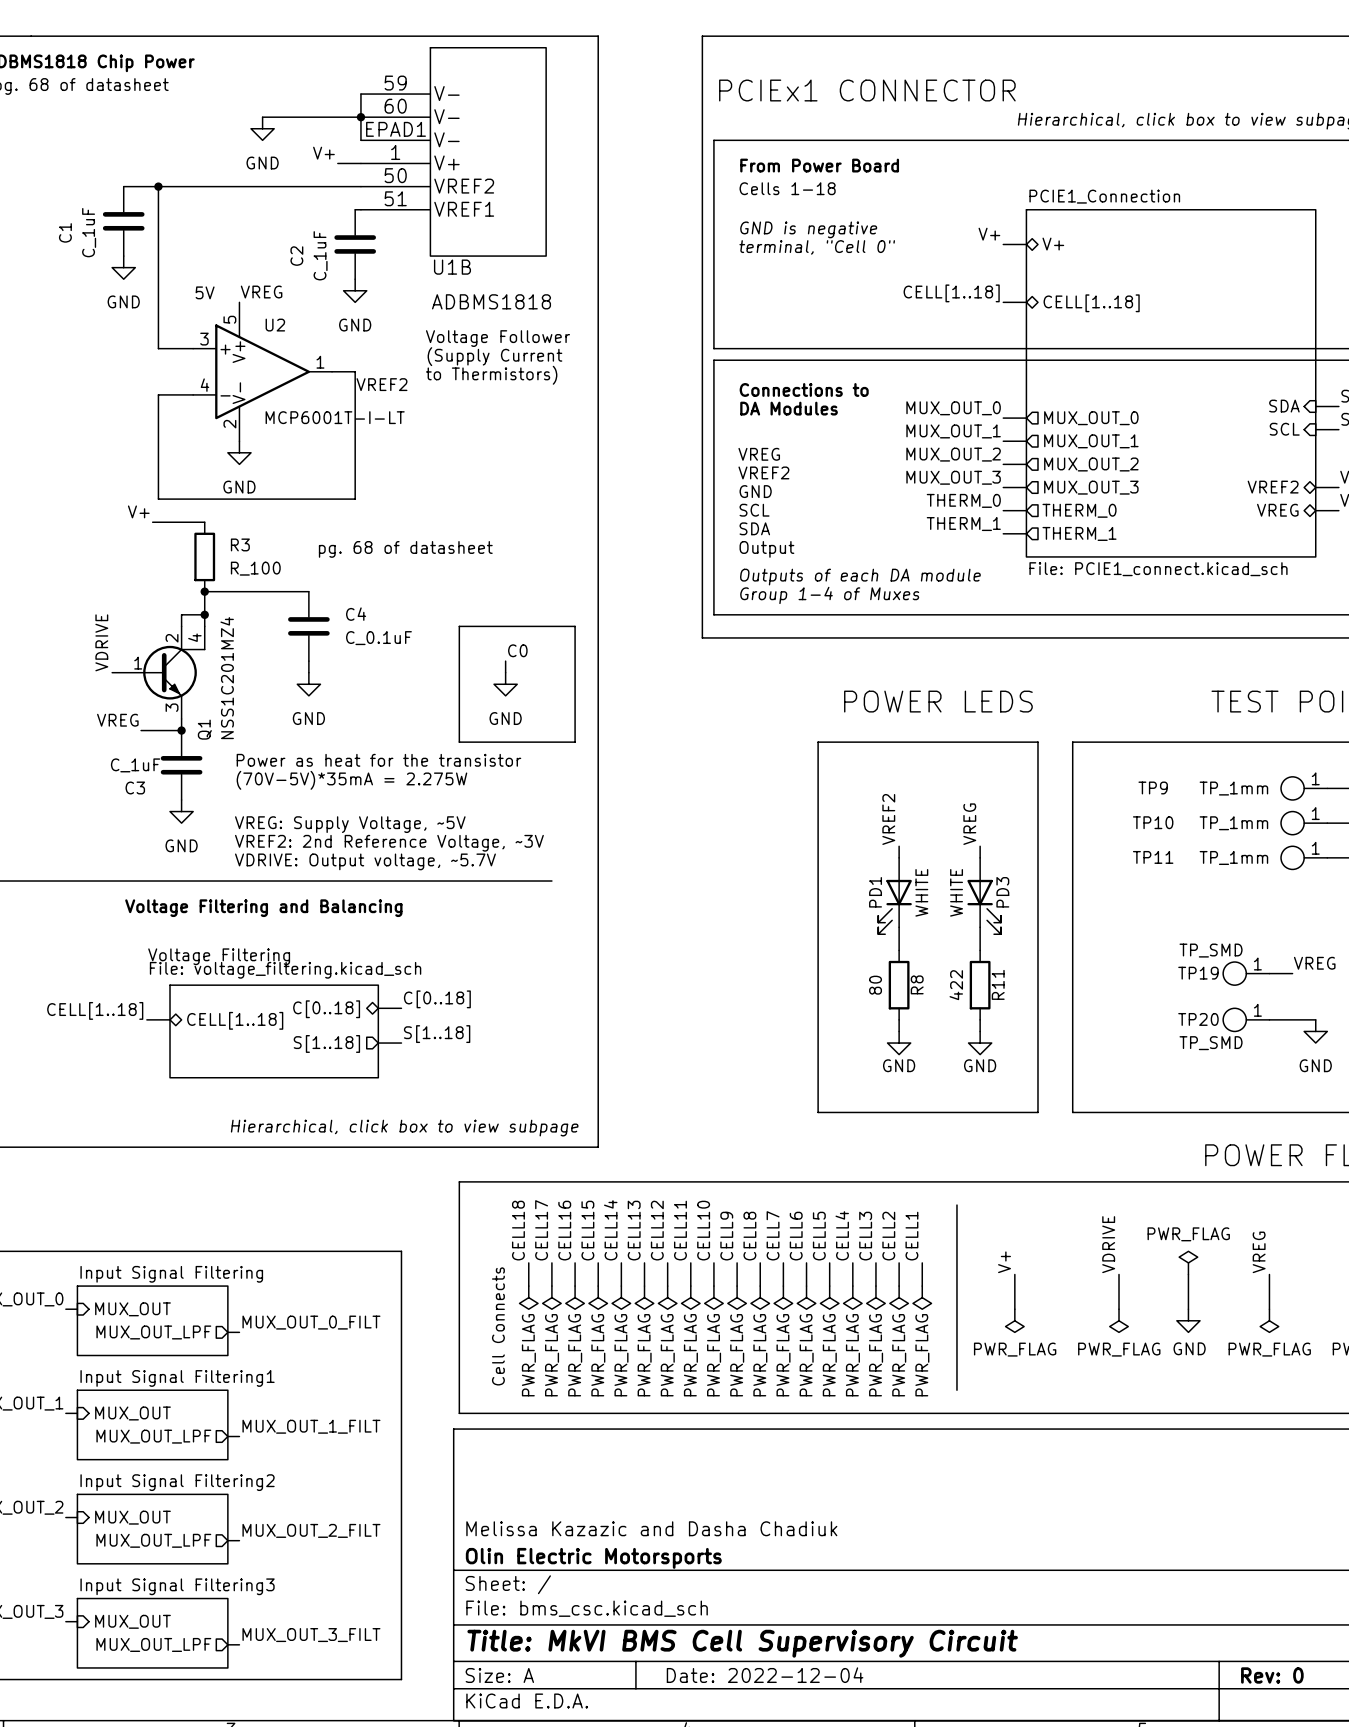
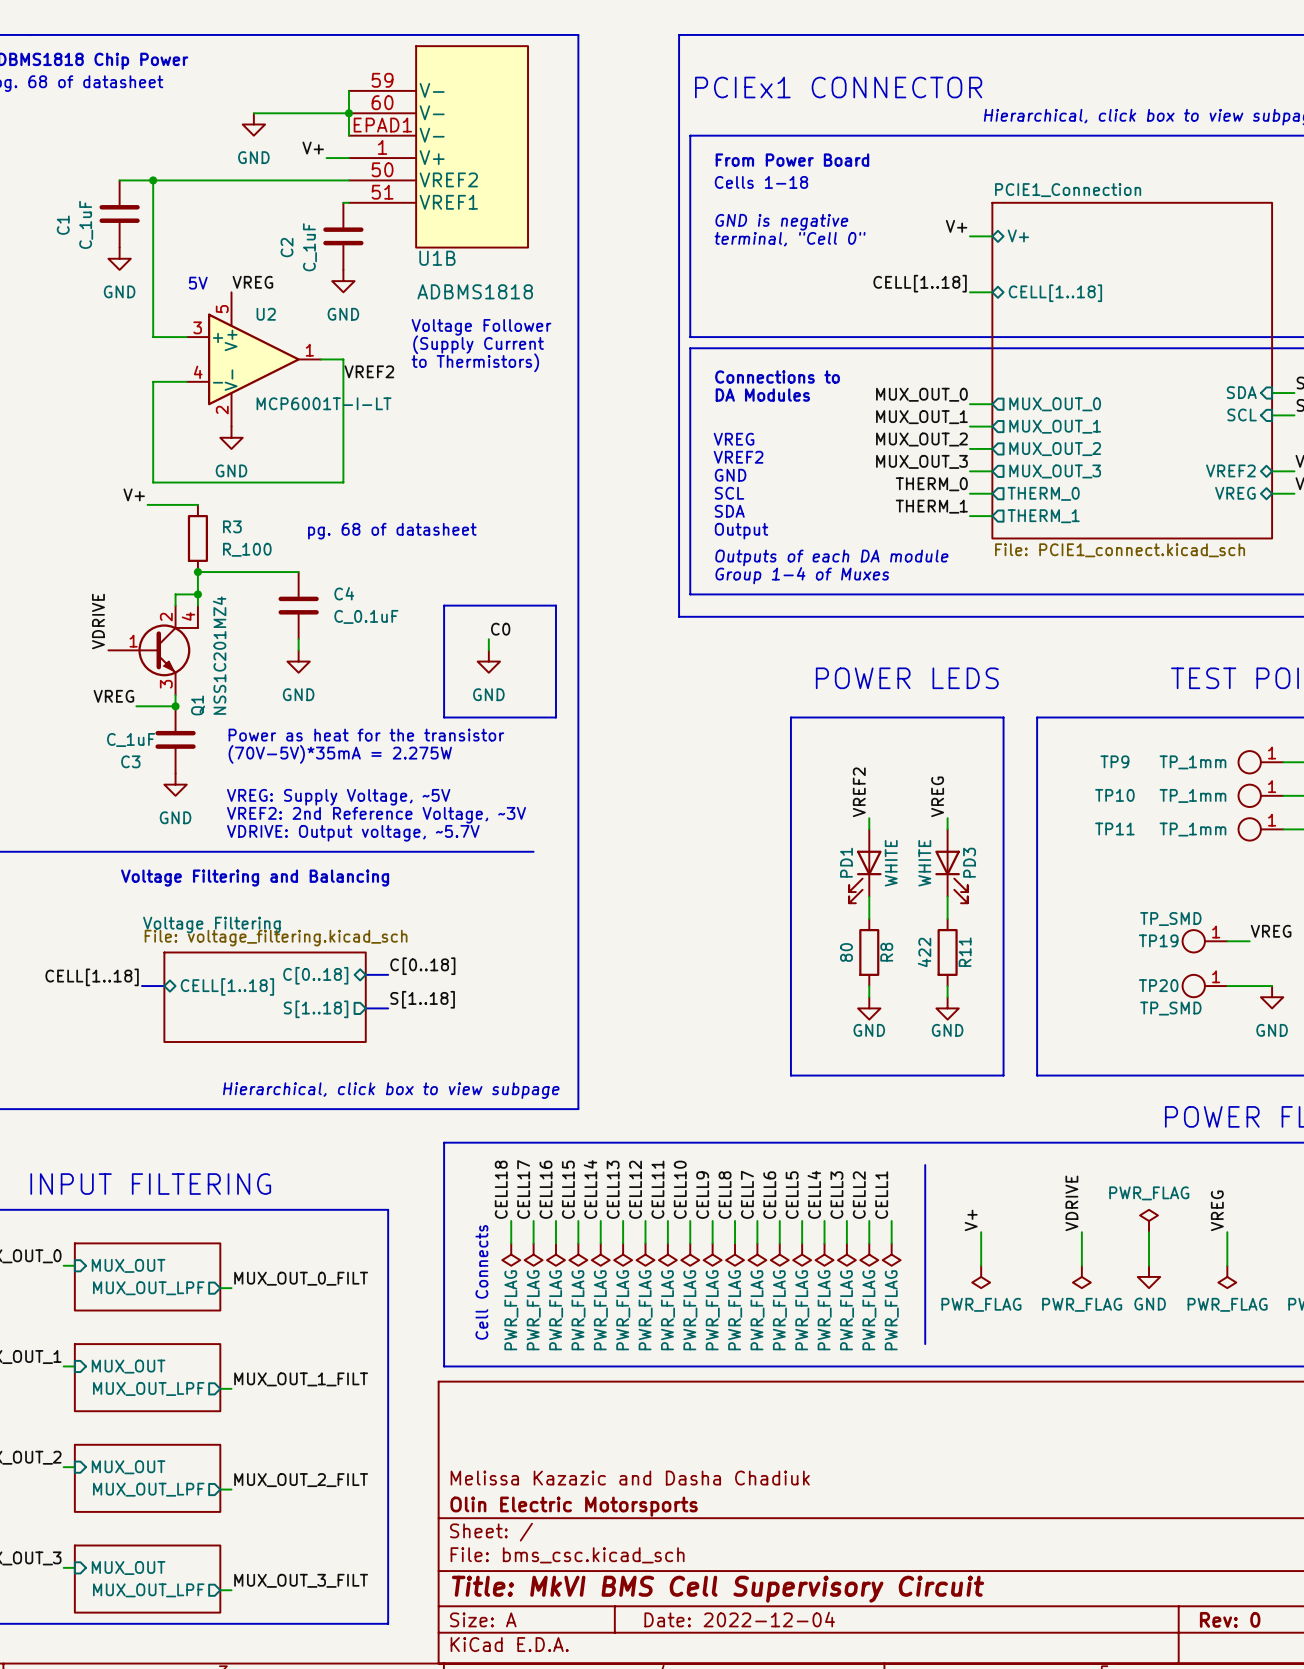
text: none -> INPUT FILTERING (150, 1184)
sheet Input Signal Filtering name: Input Signal Filtering (171, 1274) -> none
sheet Input Signal Filtering1 name: Input Signal Filtering1 (177, 1378) -> none
sheet Input Signal Filtering2 name: Input Signal Filtering2 (177, 1482) -> none
sheet Input Signal Filtering3 name: Input Signal Filtering3 (177, 1586) -> none

